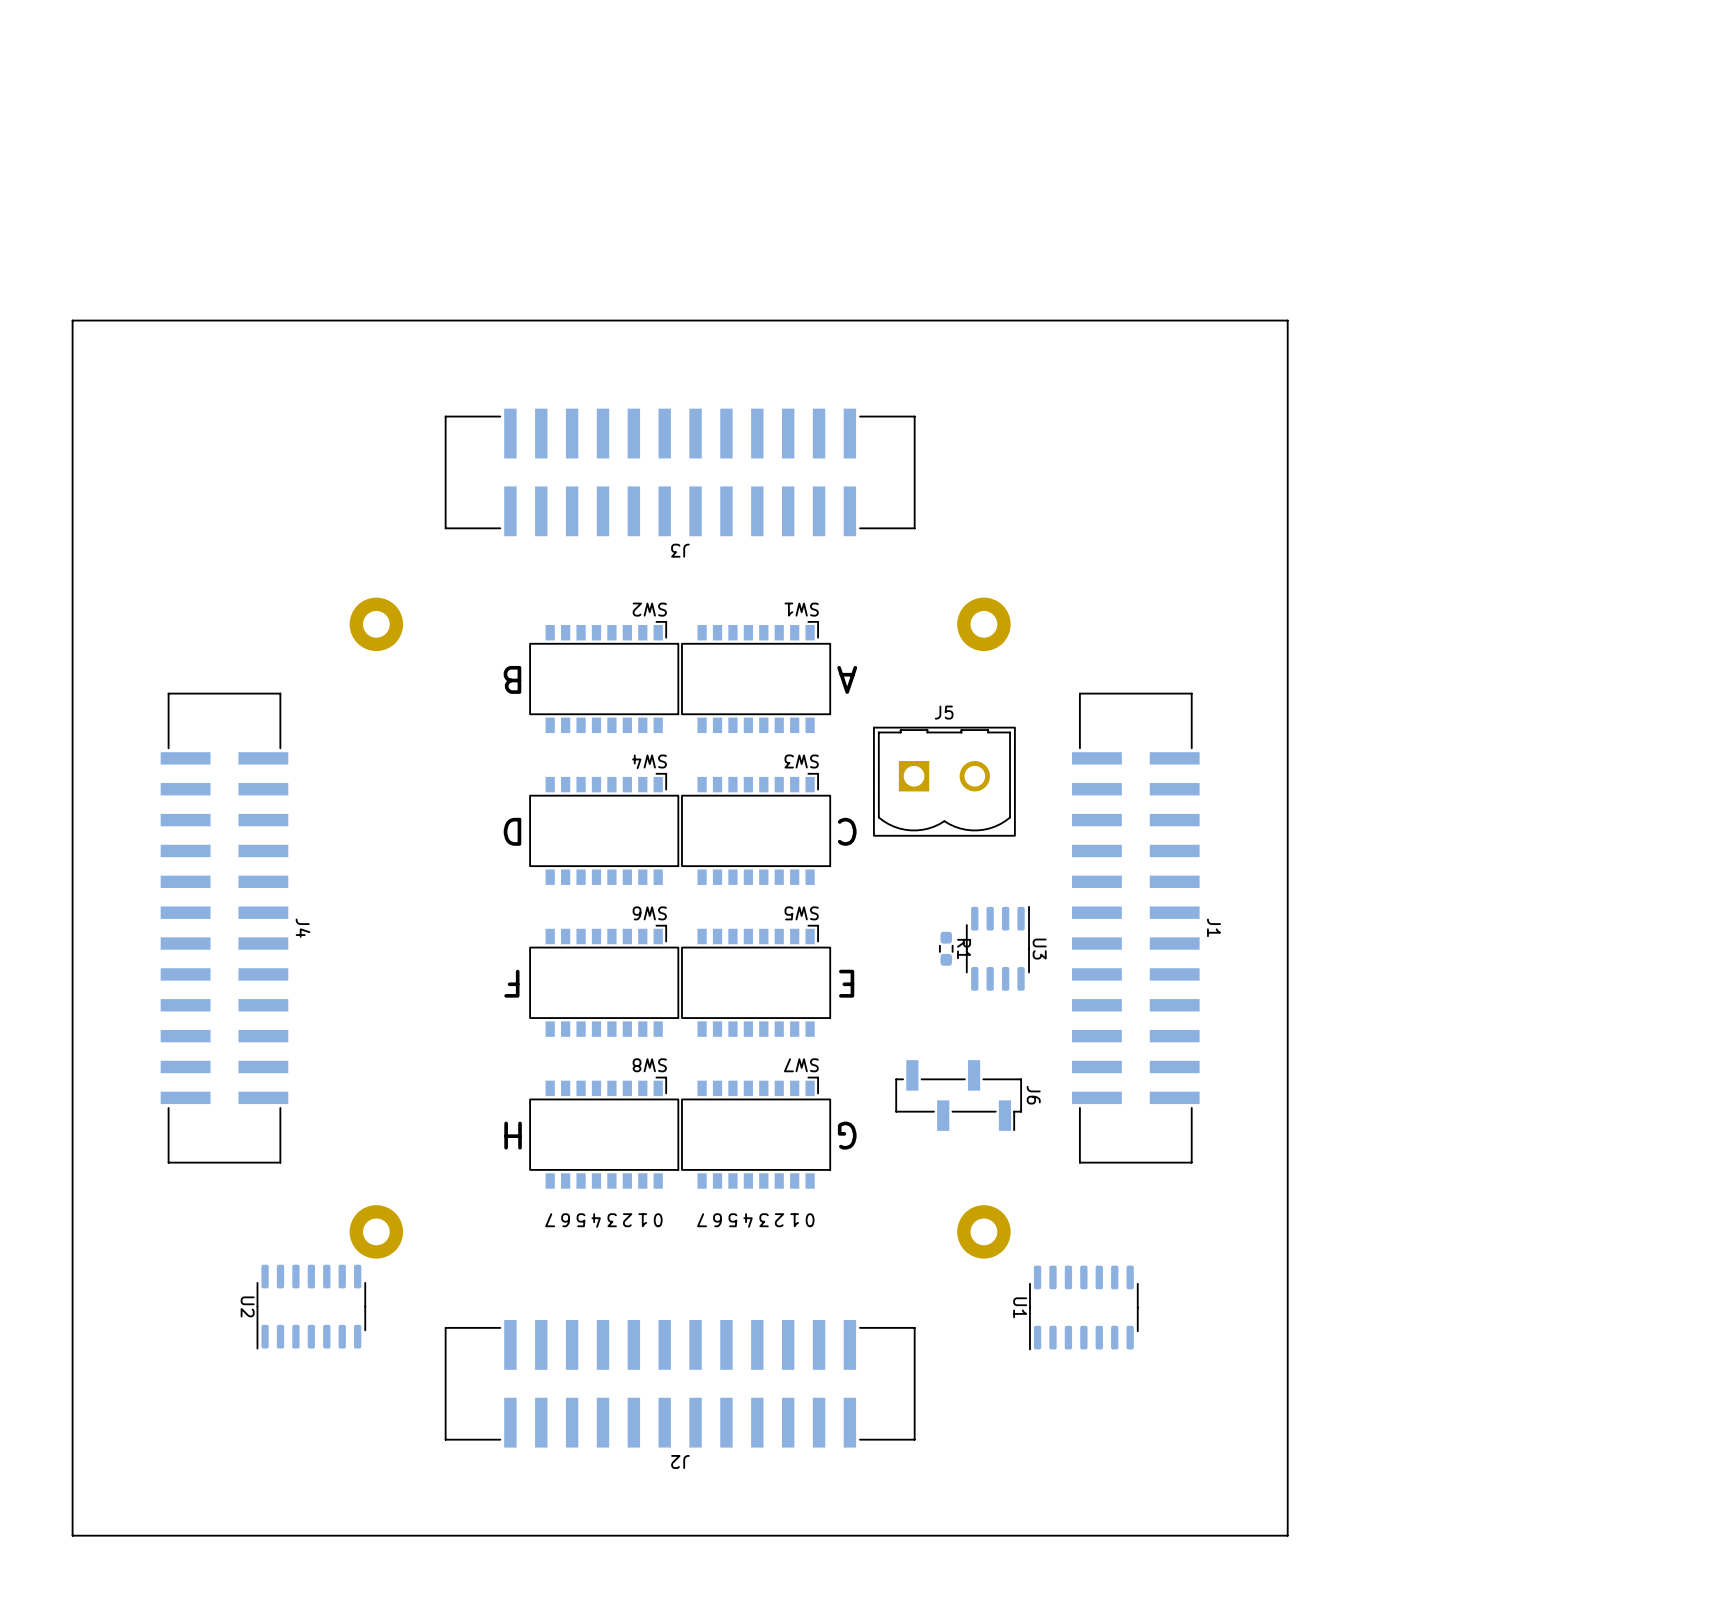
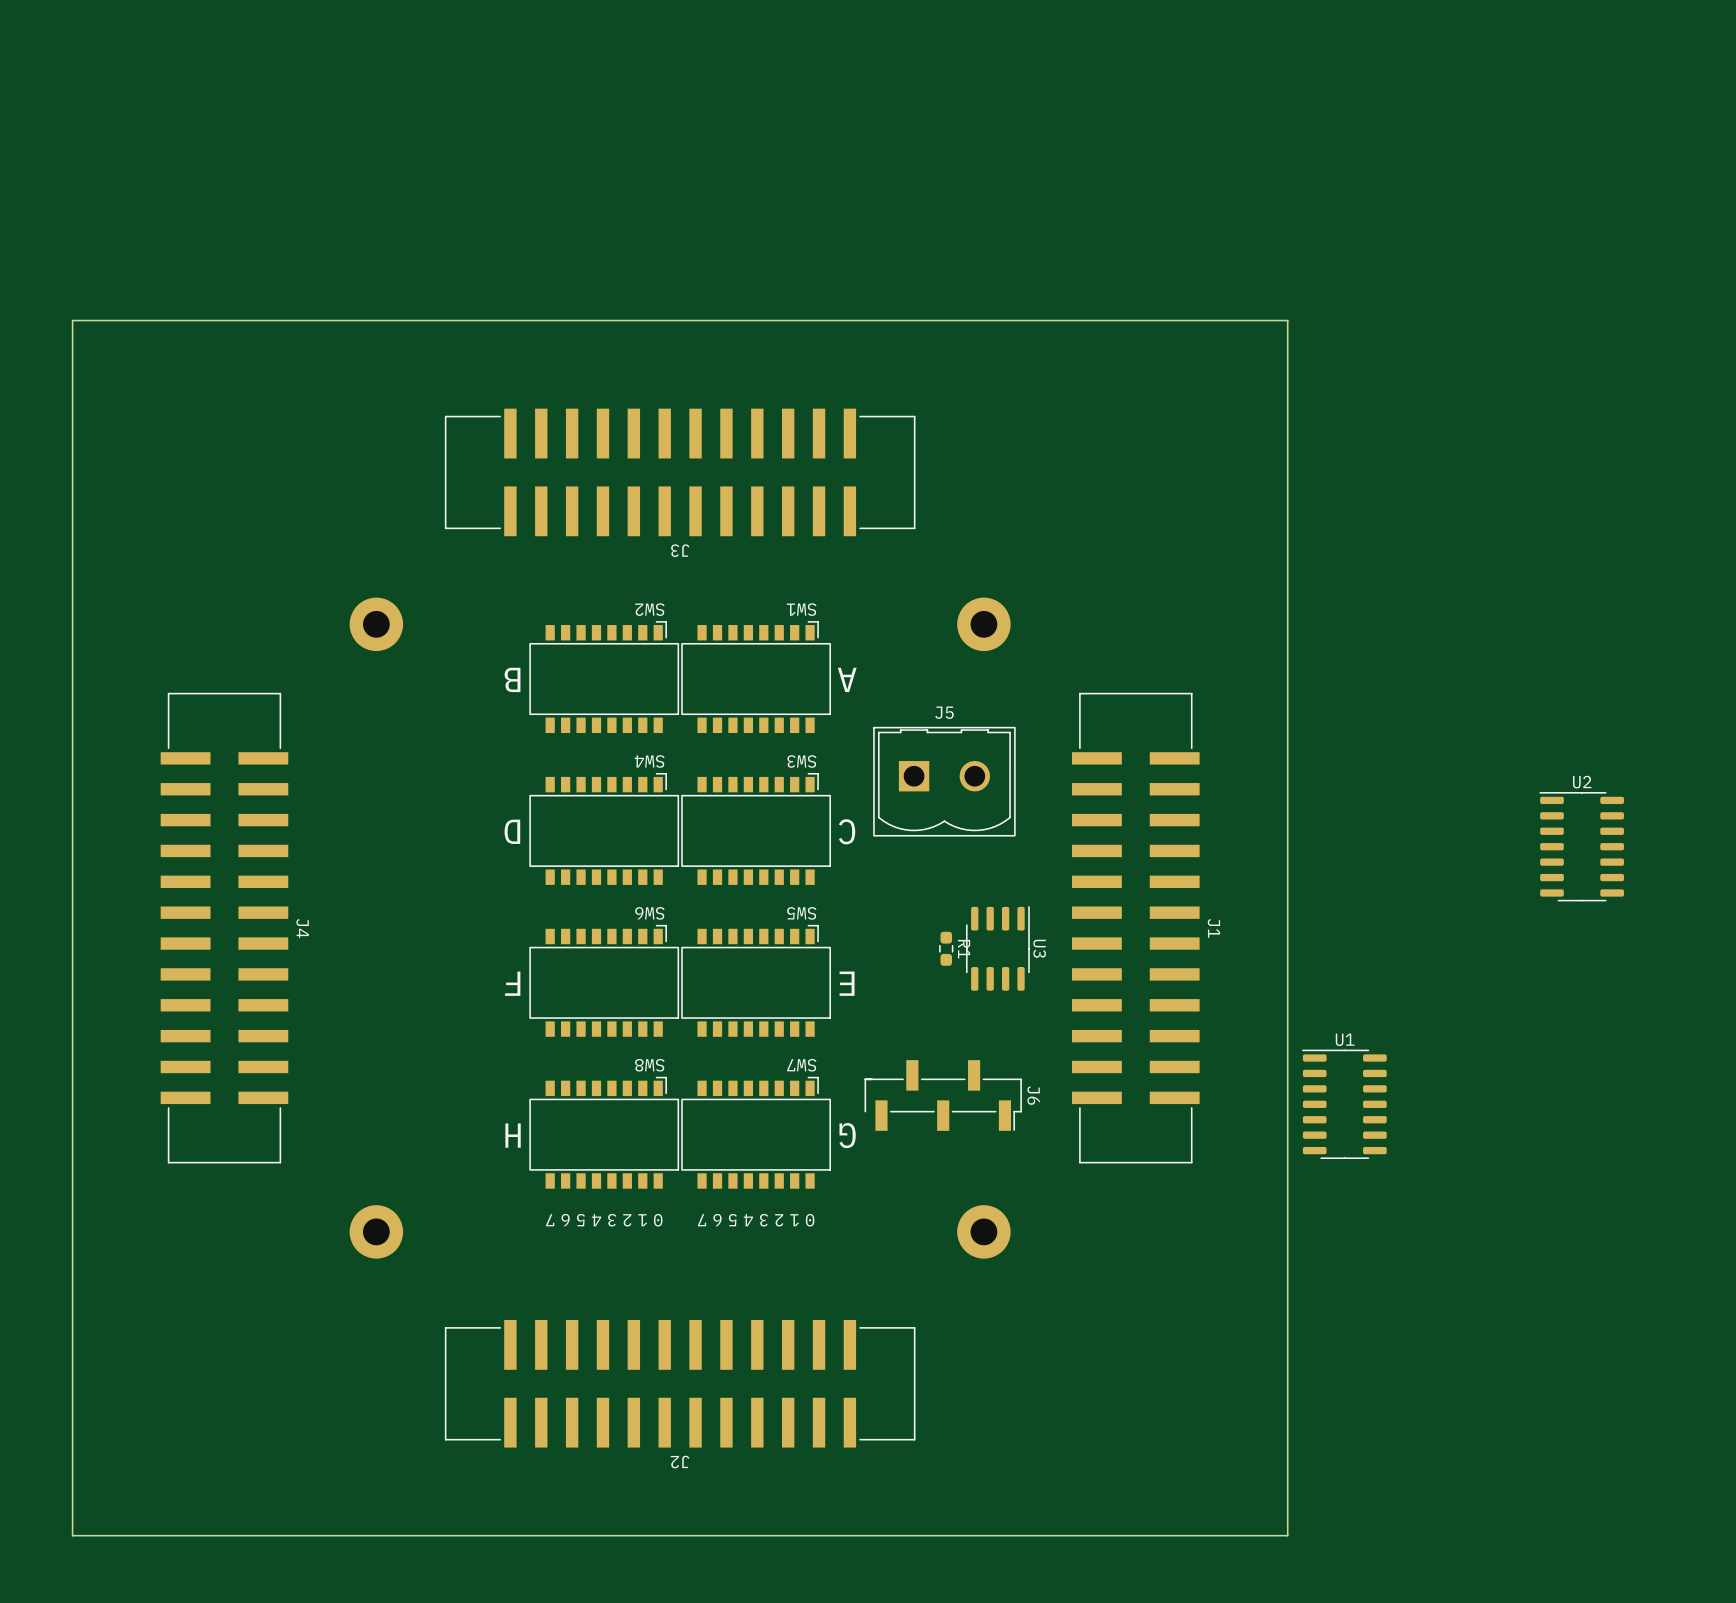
J6 footprint: [895, 1060, 1022, 1131] -> [864, 1060, 1022, 1131]
U2 rotation: 0° (311, 1306) -> 90° clockwise (1581, 846)
U2 position: (311, 1306) -> (1581, 846)
U1 rotation: 0° (1083, 1307) -> 90° clockwise (1344, 1104)
U1 position: (1083, 1307) -> (1344, 1104)

